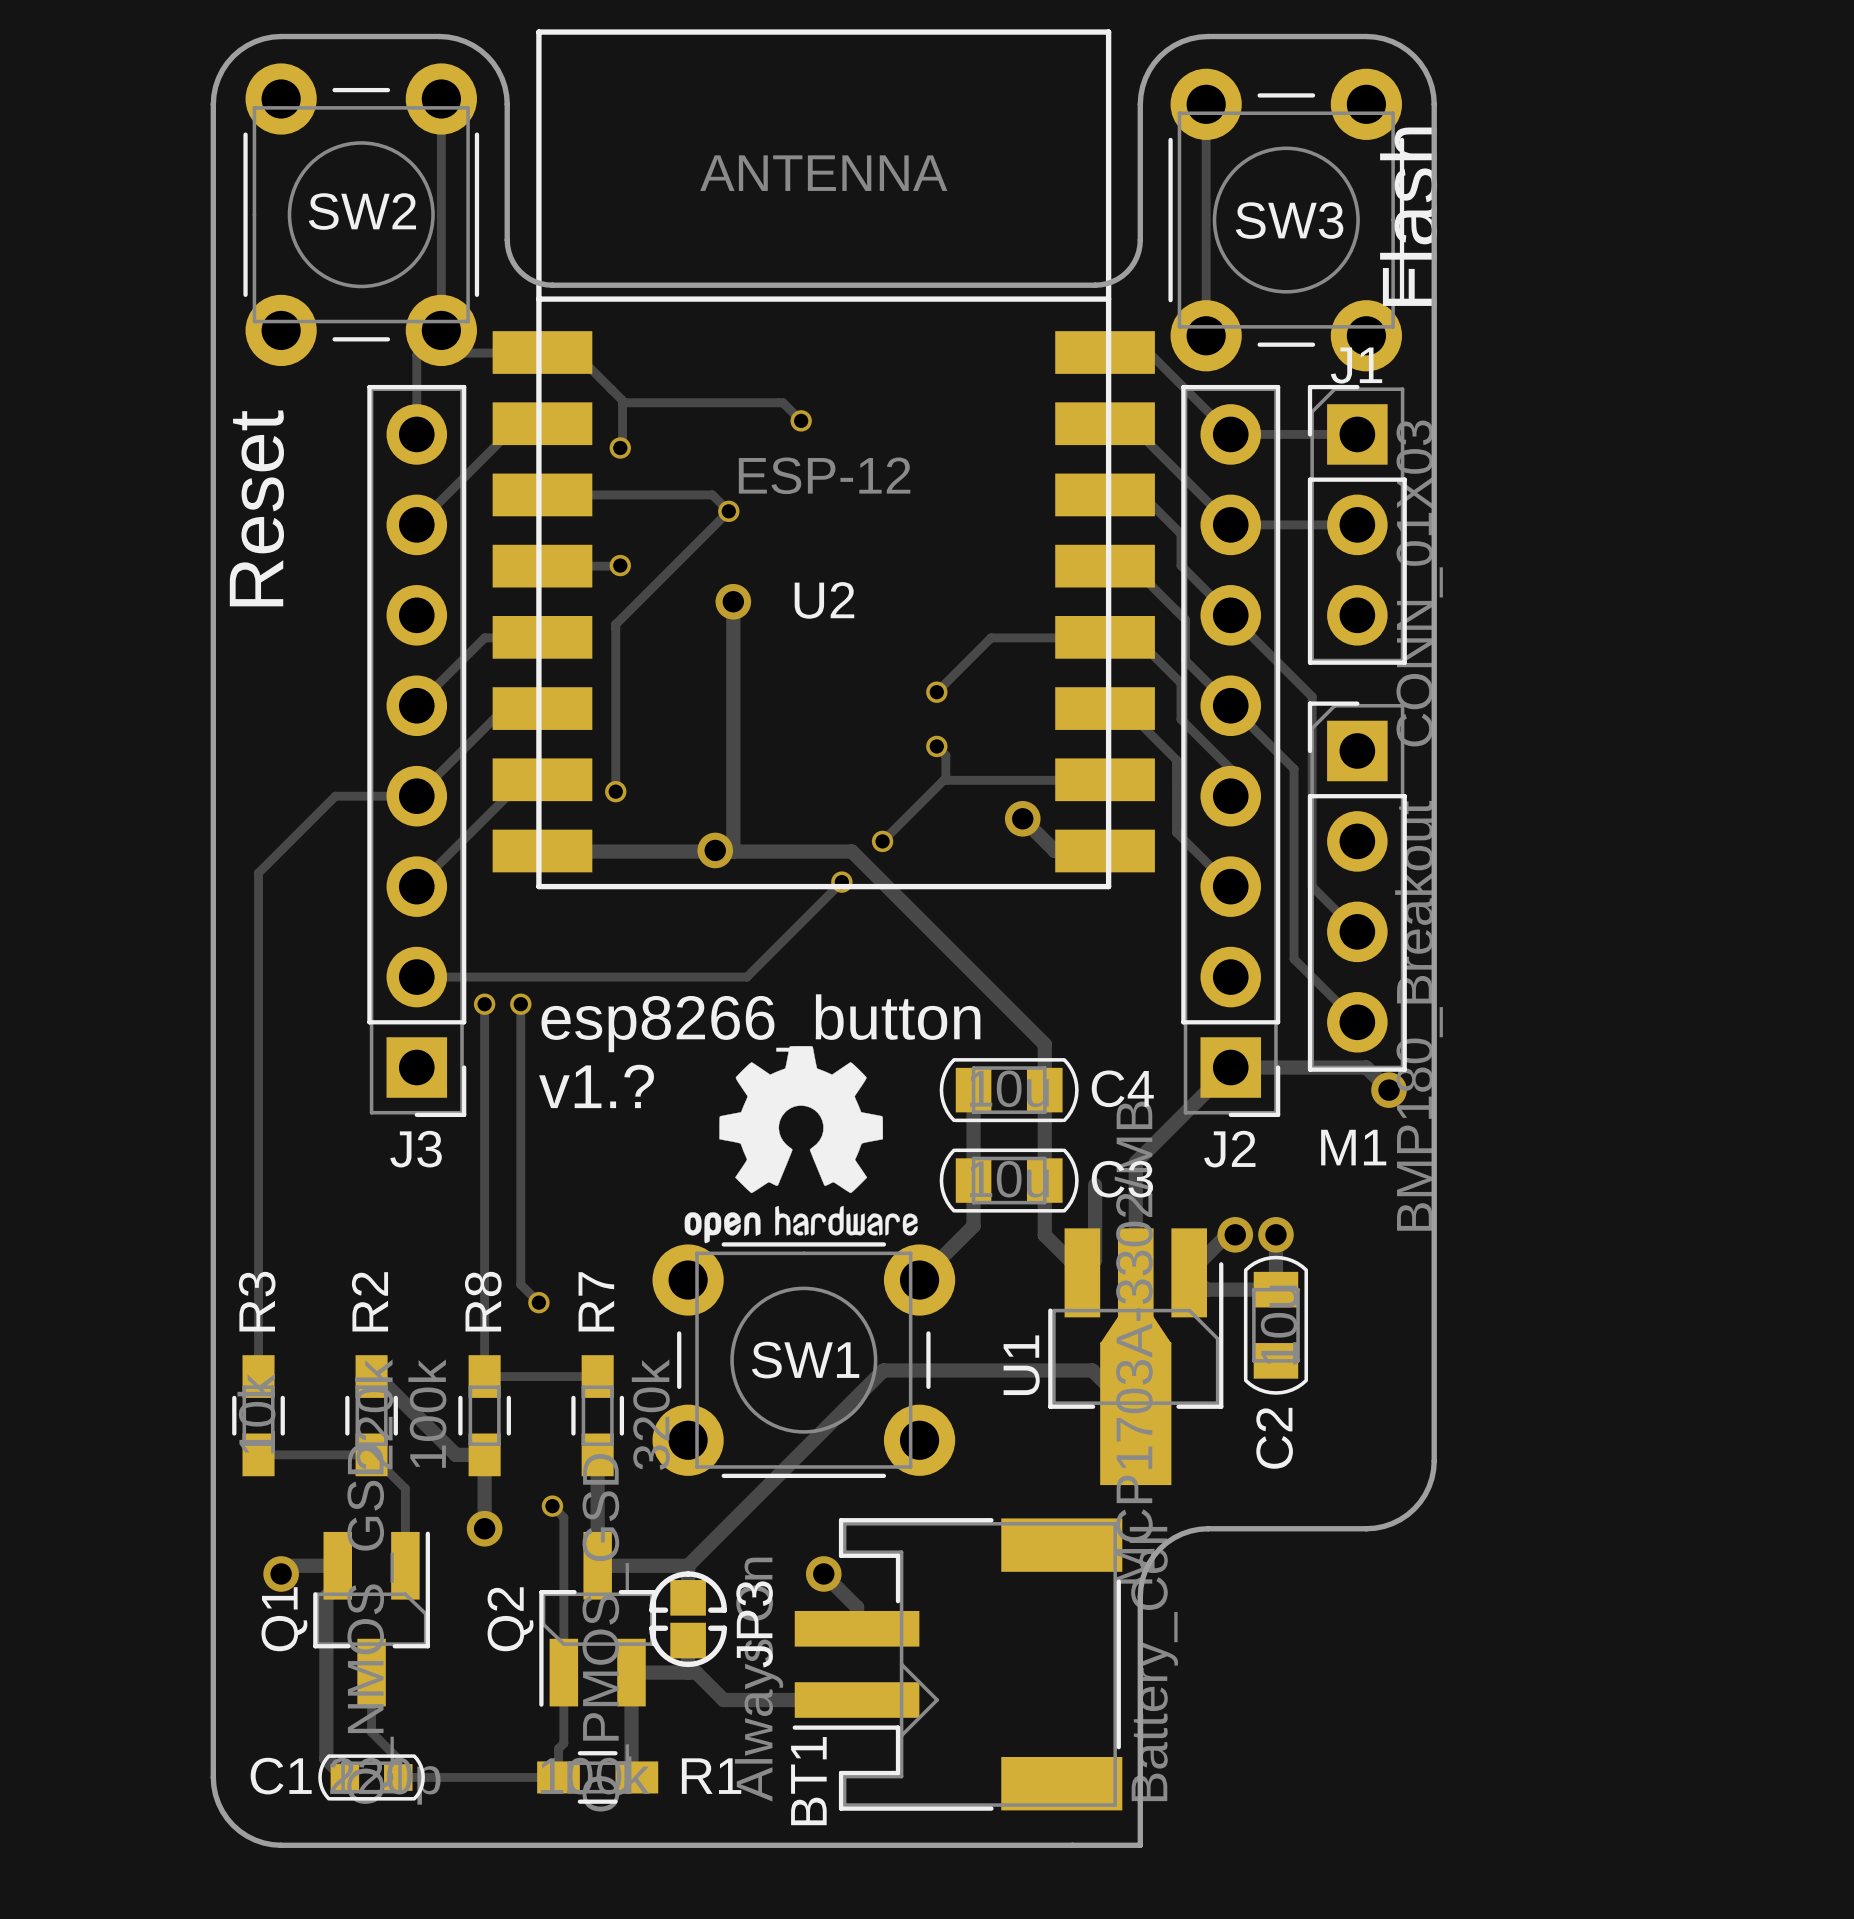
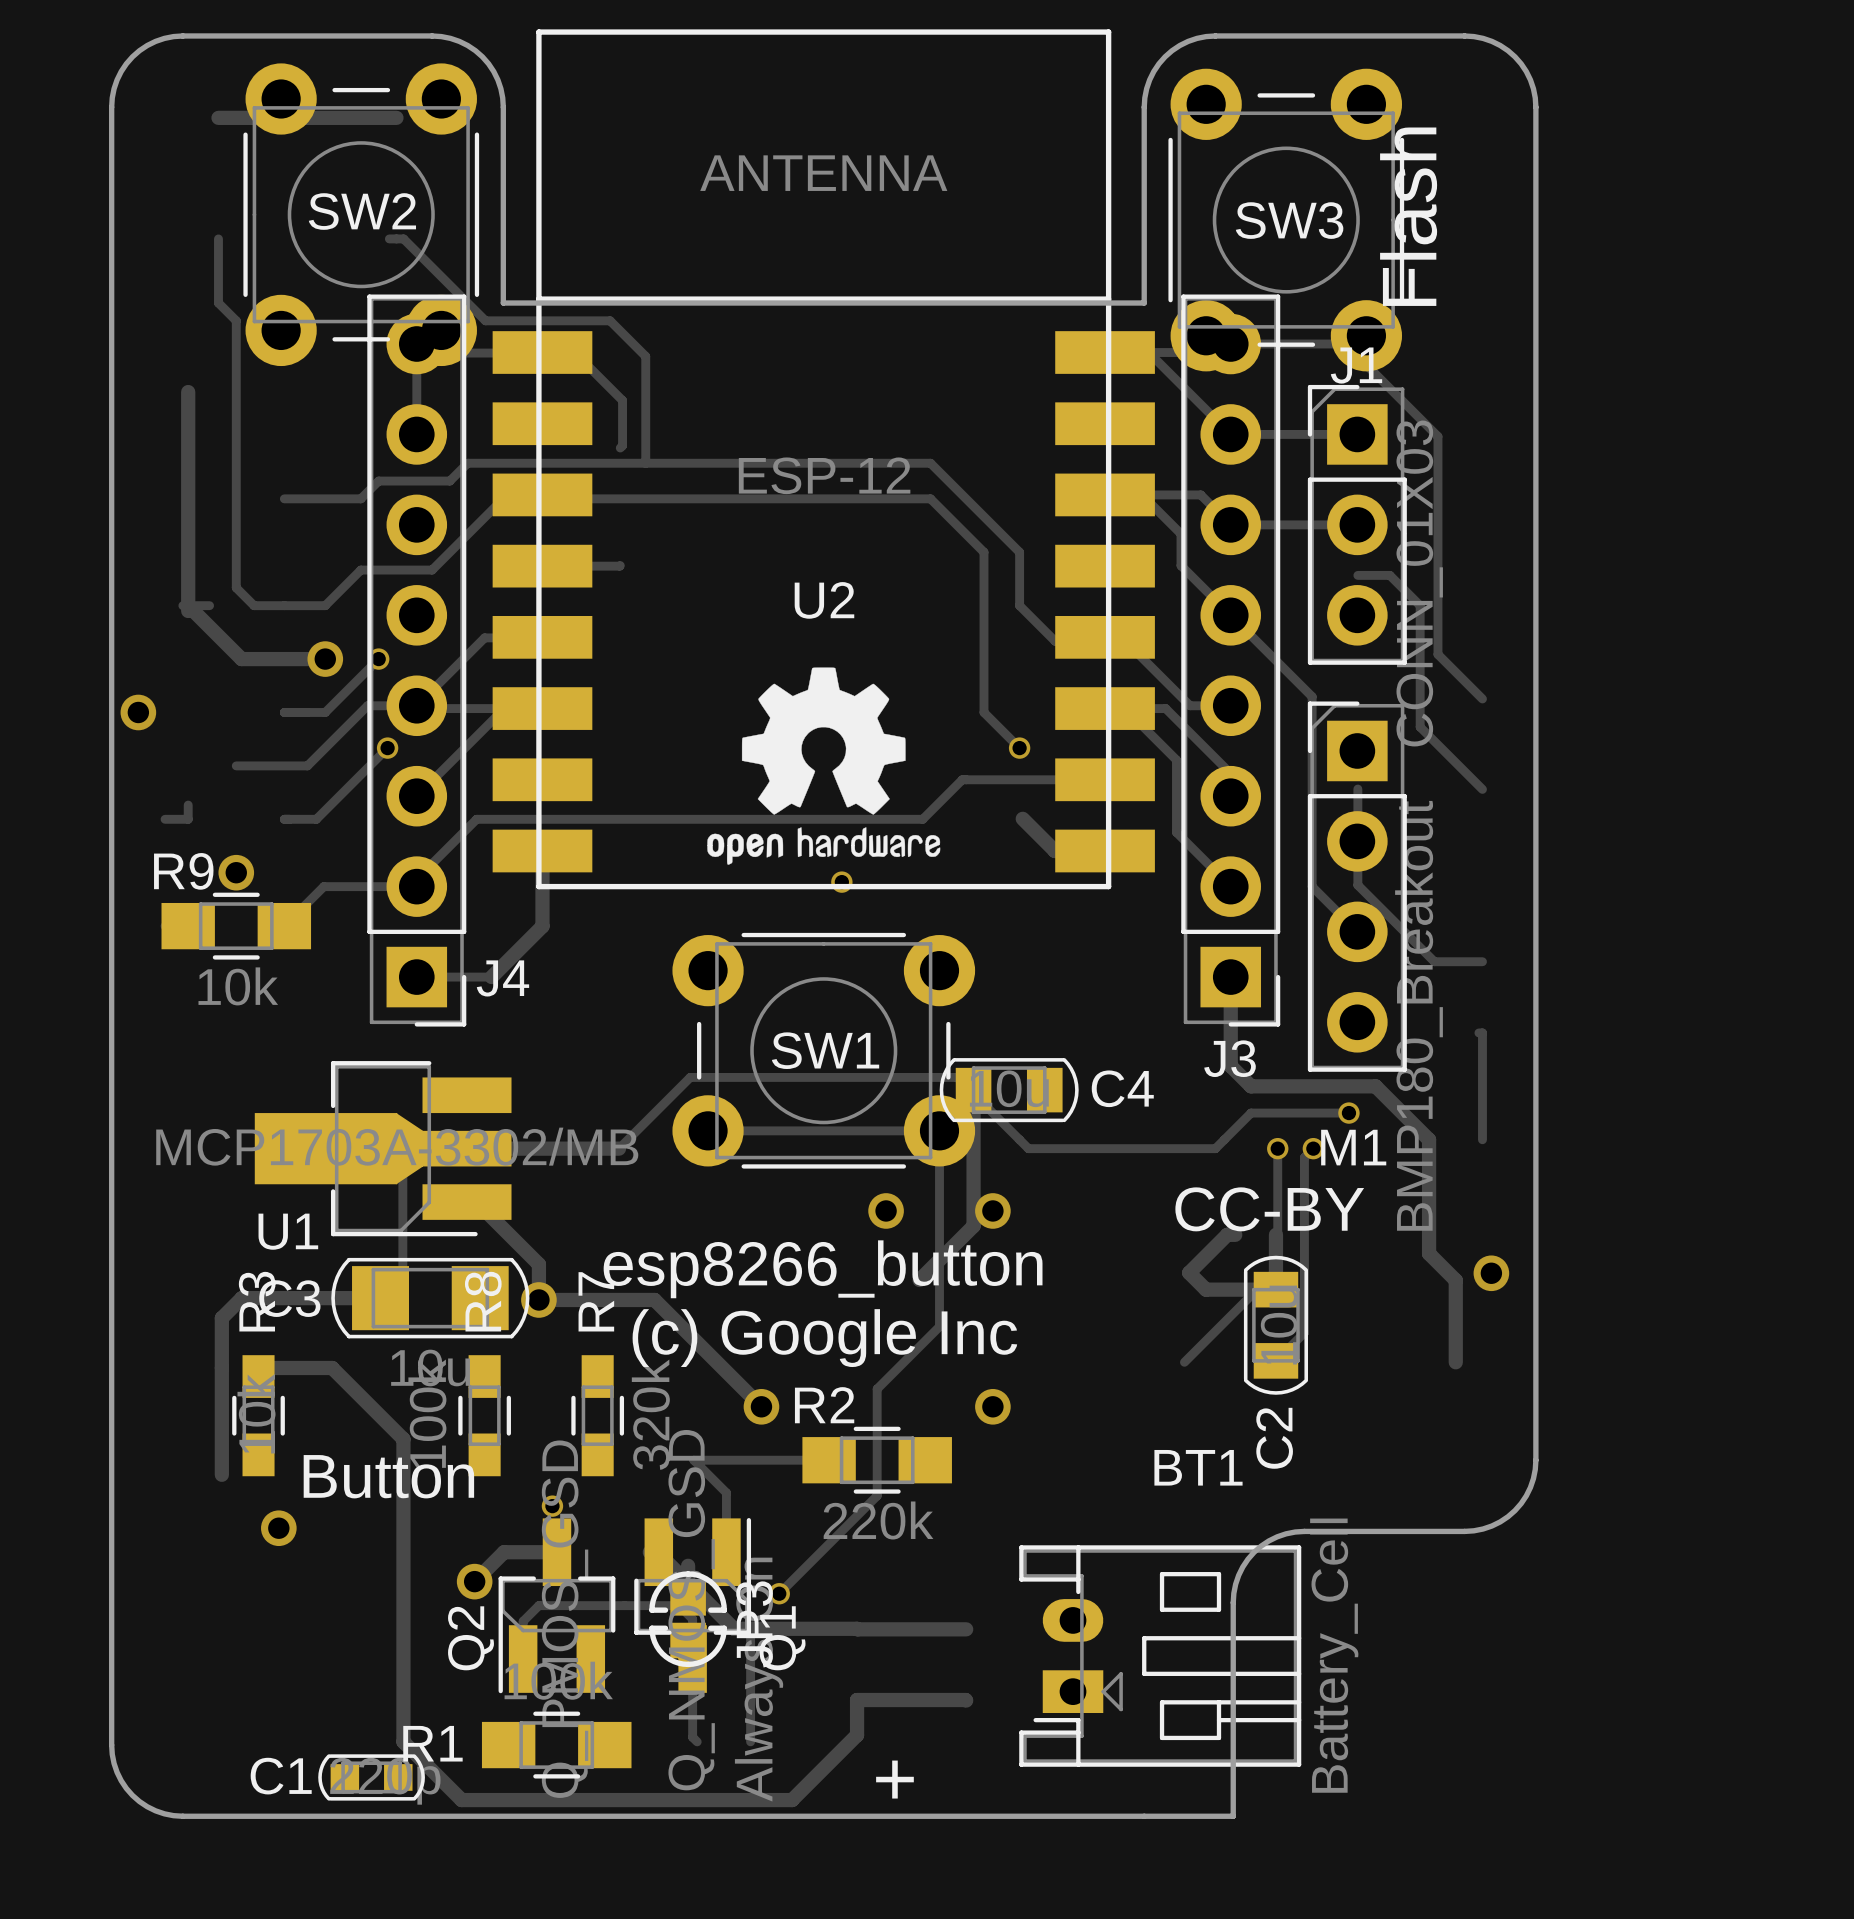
board edge: (281, 36) (448, 37) (465, 41) (487, 56) (498, 70) (506, 95) (508, 251) (513, 262) (524, 275) (540, 283) (552, 285) (1095, 285) (1106, 283) (1117, 279) (1127, 271) (1134, 262) (1138, 251) (1140, 95) (1149, 70) (1160, 56) (1174, 45) (1190, 38) (1208, 36) (1375, 37) (1392, 41) (1407, 50) (1420, 63) (1429, 78) (1434, 104) (1433, 1469) (1425, 1494) (1414, 1508) (1400, 1519) (1383, 1526) (1366, 1528) (1199, 1529) (1174, 1537) (1154, 1555) (1145, 1570) (1140, 1596) (1140, 1845) (281, 1845) (255, 1840) (239, 1831) (227, 1818) (218, 1803) (213, 1777) (213, 104) (218, 78) (233, 56) (255, 41) (281, 36) -> (182, 35) (155, 41) (132, 56) (117, 79) (111, 107) (111, 1745) (114, 1763) (121, 1780) (132, 1795) (147, 1806) (164, 1813) (182, 1816) (1233, 1816) (1233, 1602) (1238, 1575) (1247, 1559) (1268, 1540) (1295, 1532) (1464, 1531) (1483, 1528) (1500, 1521) (1515, 1510) (1530, 1487) (1535, 1469) (1535, 107) (1533, 88) (1526, 71) (1515, 56) (1500, 45) (1473, 36) (1215, 35) (1197, 38) (1179, 45) (1158, 63) (1149, 79) (1144, 97) (1144, 303) (503, 303) (502, 97) (493, 71) (475, 50) (450, 38) (432, 35) (182, 35)
track: (441, 98) (441, 330) -> none
track: (1206, 104) (1206, 335) -> none
track: none -> (218, 117) (396, 117)
track: none -> (218, 238) (218, 303) (236, 320) (236, 587) (254, 605) (325, 605) (360, 570) (432, 570) (503, 498) (930, 498) (984, 552) (984, 712) (1019, 748)
track: none -> (389, 238) (403, 238) (485, 320) (610, 320) (645, 356) (645, 463)
track: none -> (1105, 352) (1222, 352) (1230, 344) (1345, 344) (1437, 436) (1437, 654) (1482, 698)
track: none -> (188, 392) (188, 611)
track: (622, 402) (783, 402) (801, 420) -> none
via: (801, 420) -> none
track: (517, 424) (416, 524) -> none
track: (1130, 424) (1200, 494) -> (1142, 494) (1200, 494)
via: (620, 448) -> none
track: (542, 494) (712, 494) (728, 511) (615, 624) (615, 791) -> none
track: none -> (284, 498) (360, 498) (378, 481) (449, 481) (467, 463) (930, 463) (1019, 552) (1019, 605) (1055, 641) (1105, 641)
text: Reset (256, 508) -> none
via: (728, 511) -> none
via: (620, 565) -> none
track: (1131, 566) (1185, 619) (1185, 660) (1294, 769) (1294, 958) (1357, 1022) -> none
track: none -> (1357, 575) (1389, 575) (1420, 605) (1420, 727) (1482, 789)
track: (733, 601) (733, 851) -> none
via: (733, 601) -> none
track: none -> (182, 605) (209, 605)
track: none -> (188, 605) (241, 659) (325, 659)
track: (1063, 637) (991, 637) (936, 692) -> none
track: none -> (1121, 637) (1190, 705) (1230, 705)
track: (1126, 637) (1135, 637) (1181, 683) (1181, 719) (1230, 769) (1230, 773) -> (1125, 708) (1165, 708) (1230, 773)
via: none -> (325, 659)
track: none -> (378, 659) (325, 712) (284, 712)
via: none -> (378, 659)
J4: none -> (416, 660)
via: (936, 692) -> none
track: none -> (542, 708) (419, 708) (416, 705) (367, 705) (307, 765) (236, 765)
via: none -> (138, 712)
track: (936, 746) (945, 755) (945, 780) -> none
via: (936, 746) -> none
track: none -> (387, 748) (316, 819) (284, 819)
via: none -> (387, 748)
via: none -> (1019, 748)
J3 position: (416, 750) -> (1230, 660)
J2: (1230, 750) -> none
track: none -> (1105, 779) (962, 779) (922, 819) (476, 819) (416, 879) (416, 886) (323, 886) (284, 926)
track: (523, 780) (416, 886) -> none
track: (1073, 780) (943, 780) (882, 841) -> none
track: none -> (1357, 789) (1357, 885) (1434, 961) (1482, 961)
via: (615, 791) -> none
track: (416, 796) (335, 796) (258, 873) (258, 1376) -> none
track: none -> (188, 805) (188, 819) (165, 819)
via: (1022, 818) -> none
via: (882, 841) -> none
via: (715, 850) -> none
track: (575, 851) (851, 851) (1044, 1044) (1044, 1235) (1082, 1272) (1095, 1260) (1095, 1185) -> none
via: none -> (236, 872)
track: (841, 882) (746, 977) (491, 977) -> (542, 854) (542, 926) (491, 977)
R9: none -> 10k (236, 926)
track: none -> (1230, 977) (1230, 1066) (1251, 1086) (1375, 1086) (1429, 1139) (1429, 1253) (1455, 1280) (1455, 1362)
track: (484, 1004) (484, 1376) (597, 1376) -> none
via: (484, 1004) -> none
track: (520, 1004) (520, 1284) (538, 1302) -> none
via: (520, 1004) -> none
text position: esp8266_button (760, 1023) -> esp8266_button (823, 1269)
track: none -> (1478, 1032) (1482, 1032) (1482, 1139)
text: v1.? (596, 1086) -> none
track: (1389, 1090) (1366, 1067) (1230, 1067) (1135, 1162) (1135, 1272) -> none
via: (1389, 1090) -> none
track: none -> (1348, 1113) (1251, 1113) (1215, 1148) (1028, 1148) (957, 1077) (690, 1077) (619, 1148) (467, 1148)
via: none -> (1348, 1113)
track: none -> (708, 1130) (939, 1130) (939, 1326) (877, 1389) (877, 1495) (779, 1593)
drawing position: (801, 1144) -> (823, 766)
C3 footprint: [939, 1148, 1079, 1213] -> [331, 1257, 530, 1339]
track: none -> (1277, 1148) (1277, 1269) (1184, 1362)
via: none -> (1277, 1148)
track: none -> (1313, 1148) (1304, 1157) (1304, 1332) (1274, 1362)
via: none -> (1313, 1148)
track: none -> (402, 1162) (402, 1272) (376, 1298) (241, 1298) (221, 1318) (221, 1474)
C3 name position: C3 (1122, 1179) -> C3 (289, 1298)
track: none -> (467, 1202) (476, 1202) (538, 1264) (538, 1299) (654, 1299) (761, 1406)
text: none -> CC-BY (1269, 1209)
via: none -> (886, 1210)
via: none -> (992, 1210)
via: (1235, 1234) -> none
via: (1275, 1234) -> none
via: none -> (1491, 1273)
via size: [528, 1291, 550, 1314] -> [521, 1282, 557, 1318]
R2 name position: R2 (369, 1301) -> R2 (824, 1405)
text: none -> (c) Google Inc (824, 1338)
R2 footprint: [345, 1355, 398, 1477] -> [802, 1426, 952, 1494]
U1 rotation: 0° (1135, 1356) -> 90° clockwise (383, 1148)
U1 position: (1135, 1356) -> (383, 1148)
SW1 position: (803, 1360) -> (823, 1050)
U1 name position: U1 (1021, 1365) -> U1 (288, 1231)
track: none -> (264, 1367) (332, 1367) (403, 1439) (403, 1741) (461, 1800) (792, 1800) (857, 1735) (857, 1700) (966, 1700)
track: (371, 1376) (377, 1376) (455, 1454) (484, 1454) (484, 1528) -> none
via: none -> (761, 1406)
via: none -> (992, 1406)
track: (1135, 1413) (1092, 1370) (883, 1370) (688, 1565) (597, 1565) (597, 1454) -> none
track: (258, 1454) (371, 1454) (405, 1488) (405, 1565) -> none
track: none -> (829, 1460) (693, 1460) (726, 1492) (726, 1552)
text: none -> Button (388, 1476)
track: (552, 1506) (563, 1517) (563, 1743) (558, 1748) (558, 1777) (398, 1777) (398, 1758) (371, 1732) (371, 1672) -> none
BT1 footprint: [792, 1518, 1123, 1811] -> [1019, 1545, 1302, 1767]
via position: (484, 1528) -> (474, 1581)
track: none -> (556, 1552) (504, 1552) (474, 1581)
track: none -> (649, 1552) (658, 1552) (733, 1628) (966, 1629)
track: (281, 1573) (289, 1565) (337, 1565) (337, 1585) (326, 1596) (326, 1758) (344, 1777) -> none
via position: (281, 1573) -> (278, 1528)
track: (823, 1573) (857, 1607) (857, 1628) -> none
via: (823, 1573) -> none
via: none -> (779, 1593)
Q1 name position: Q1 (284, 1619) -> Q1 (782, 1638)
Q1 position: (371, 1619) -> (692, 1605)
Q2 name position: Q2 (510, 1619) -> Q2 (471, 1638)
Q2 position: (597, 1619) -> (556, 1605)
track: none -> (752, 1629) (750, 1628) (750, 1741)
track: none -> (523, 1659) (523, 1621) (538, 1605) (679, 1605) (692, 1619) (692, 1737) (697, 1741)
track: (857, 1700) (723, 1700) (696, 1672) (631, 1672) (631, 1772) (636, 1777) -> none
R1 footprint: [537, 1751, 659, 1804] -> [481, 1711, 632, 1779]
R1 name position: R1 (711, 1776) -> R1 (432, 1743)
text: none -> + (894, 1779)
BT1 name position: BT1 (808, 1781) -> BT1 (1198, 1467)

